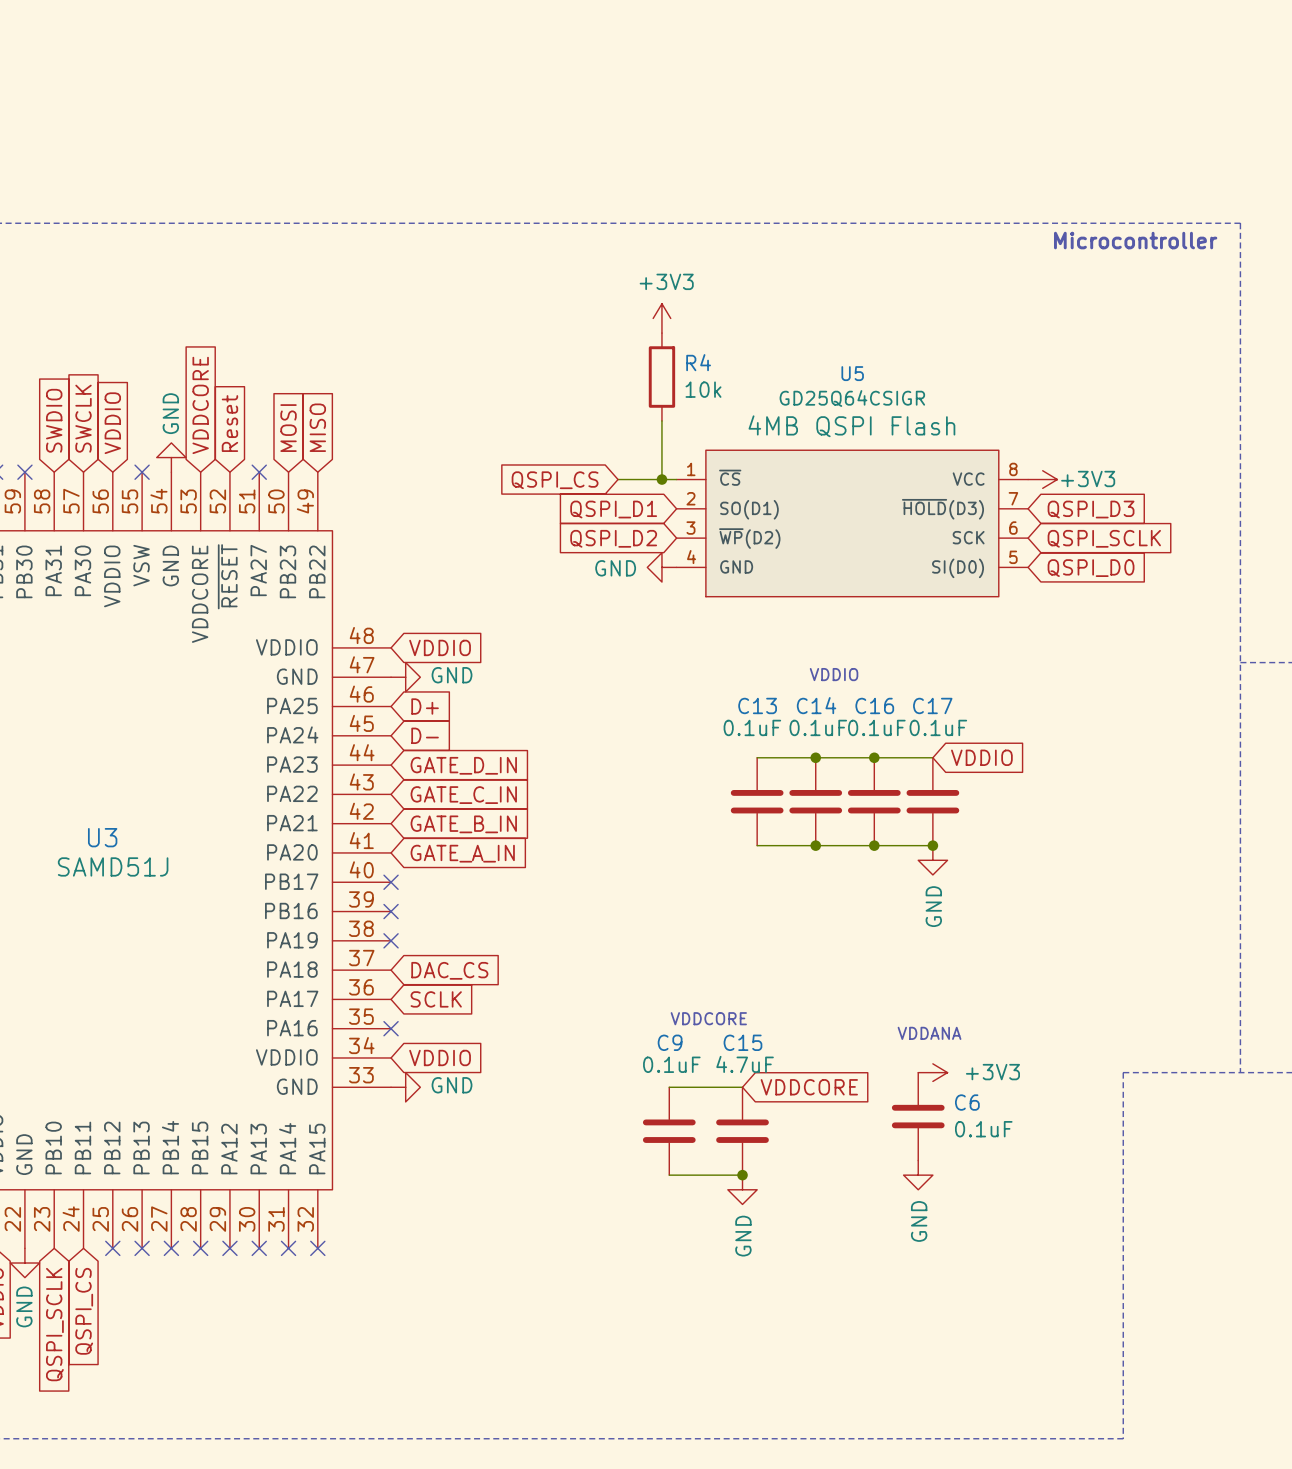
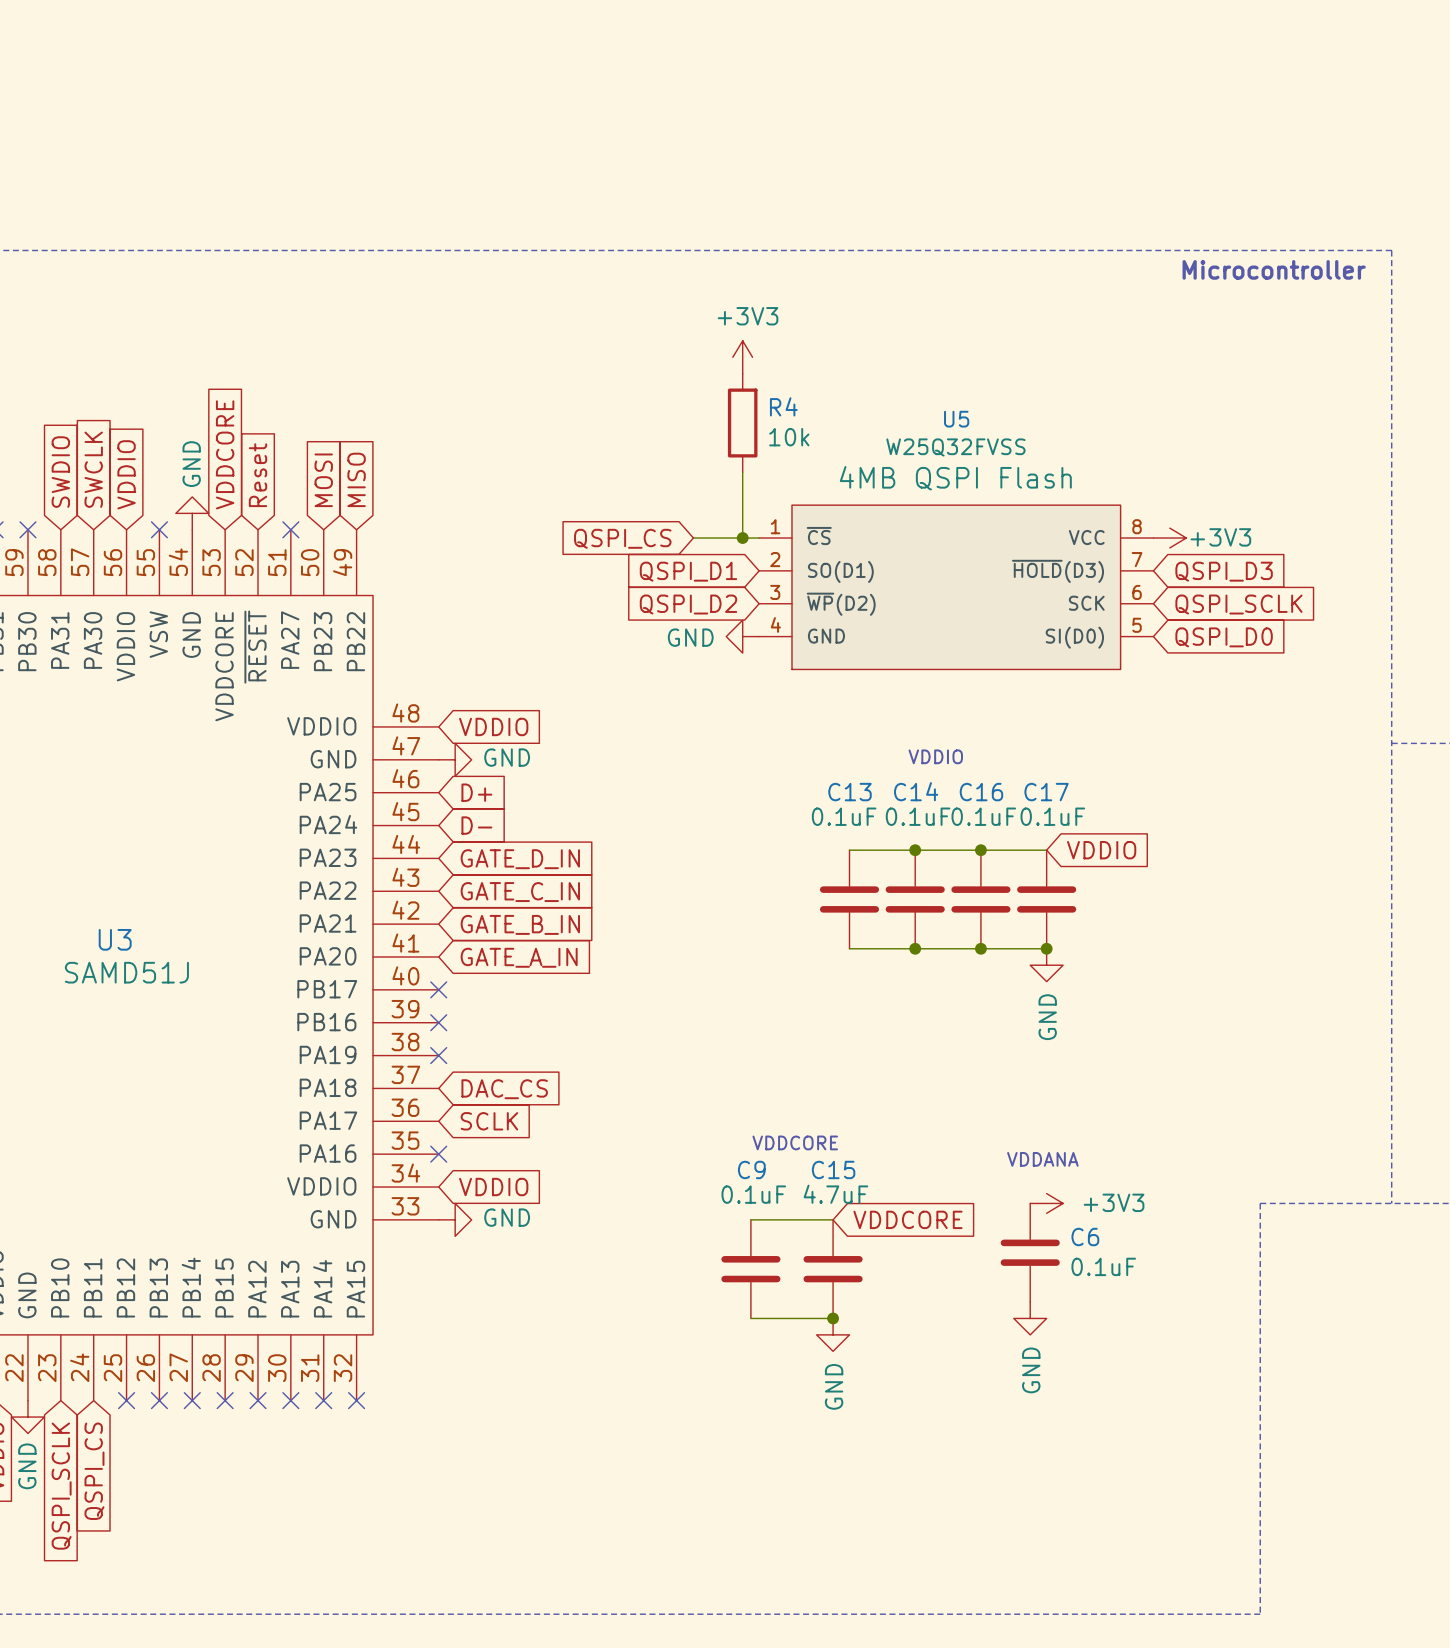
U5 value: GD25Q64CSIGR (852, 398) -> W25Q32FVSS (955, 447)

